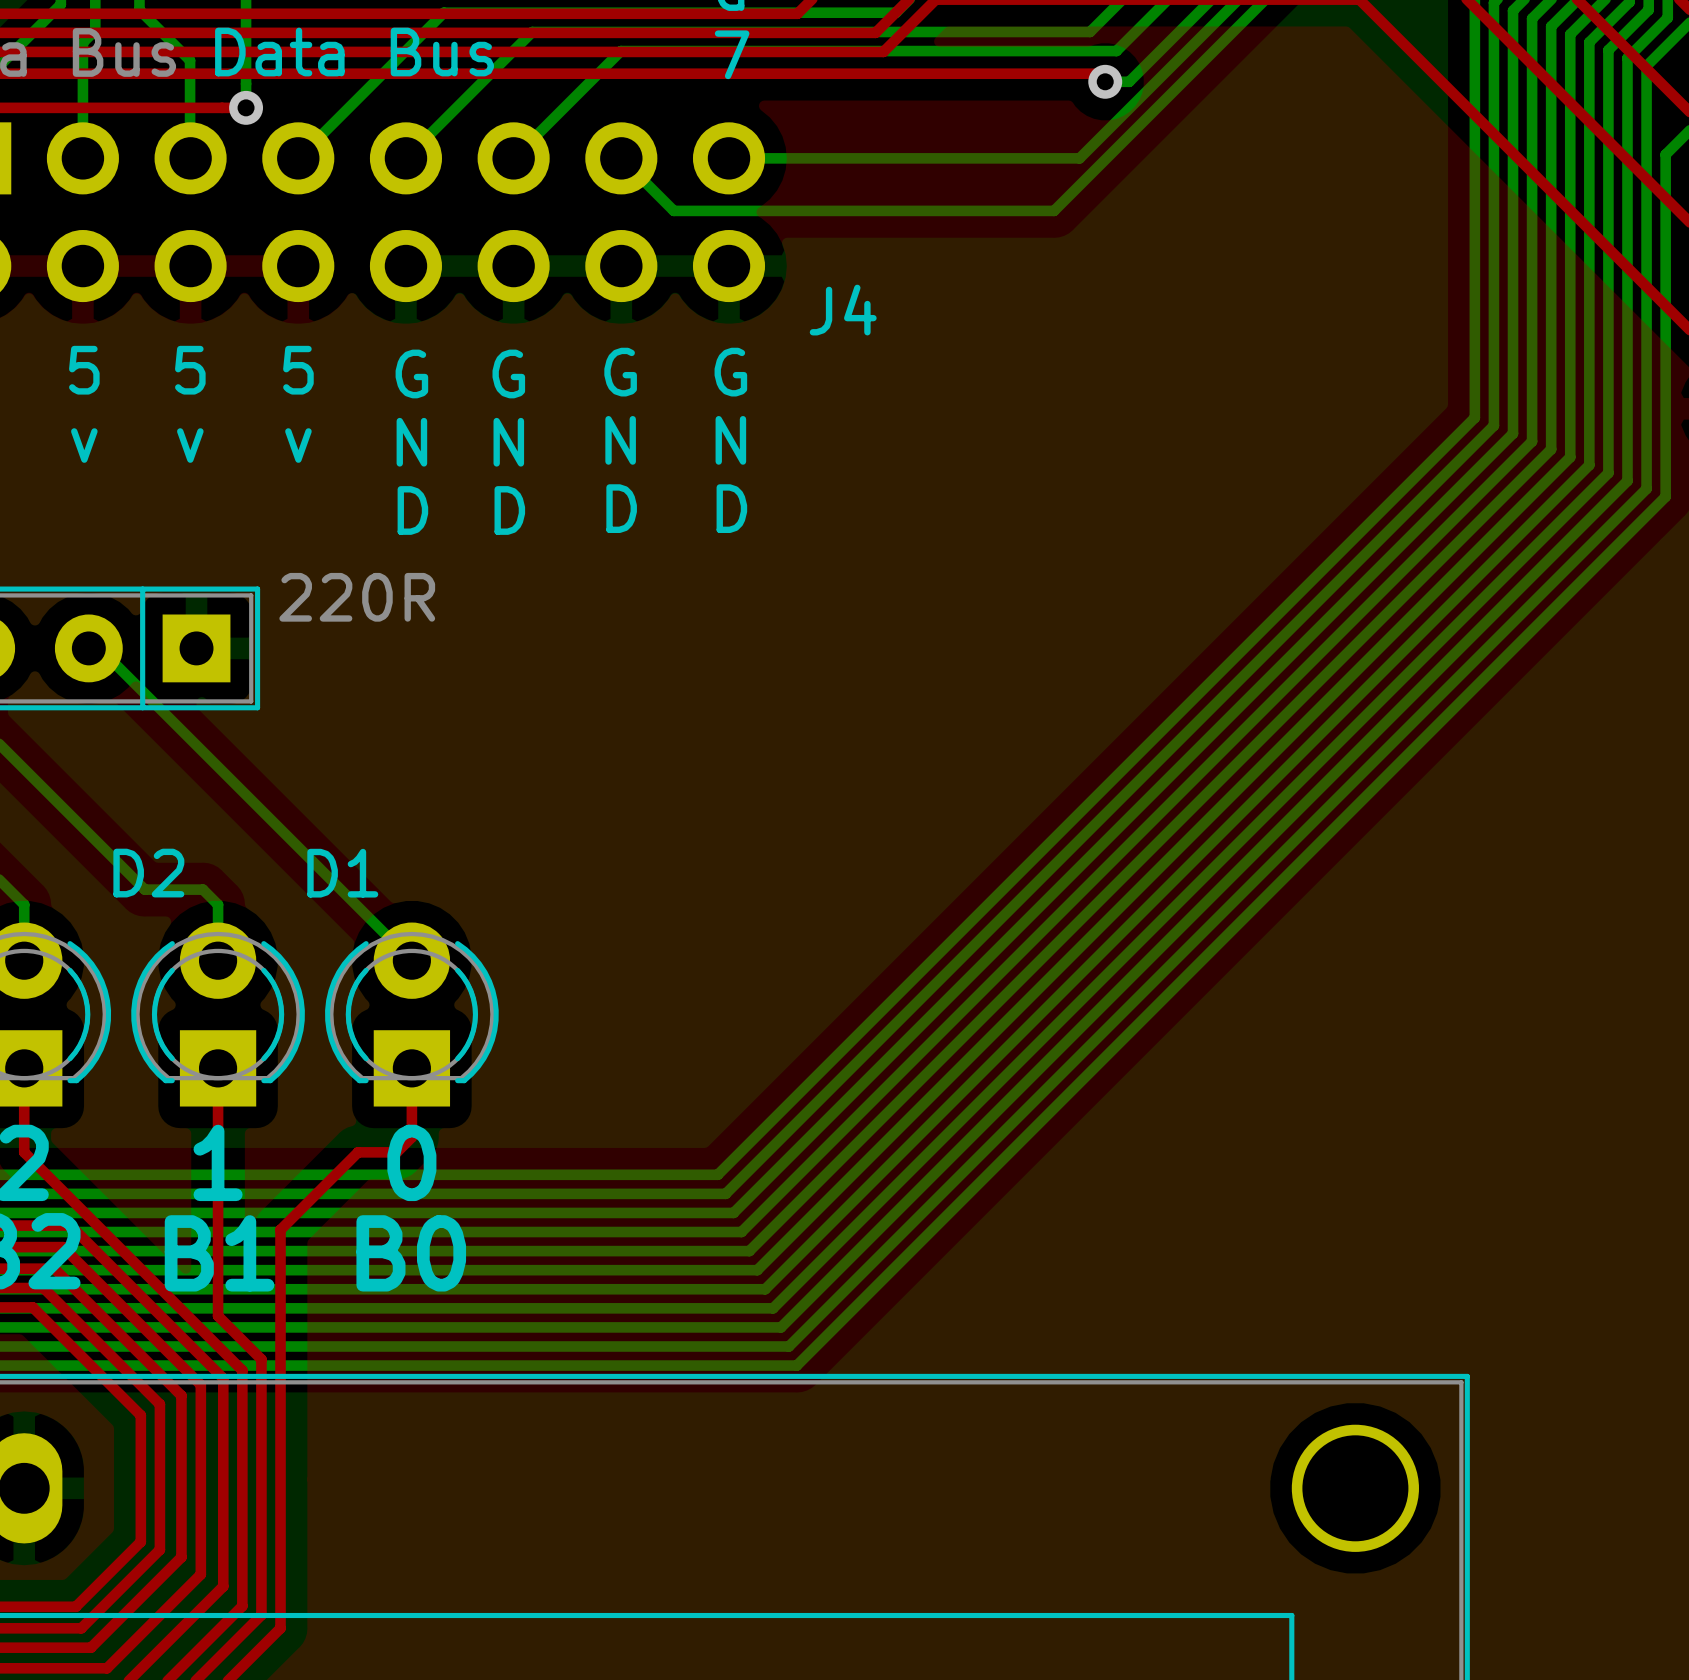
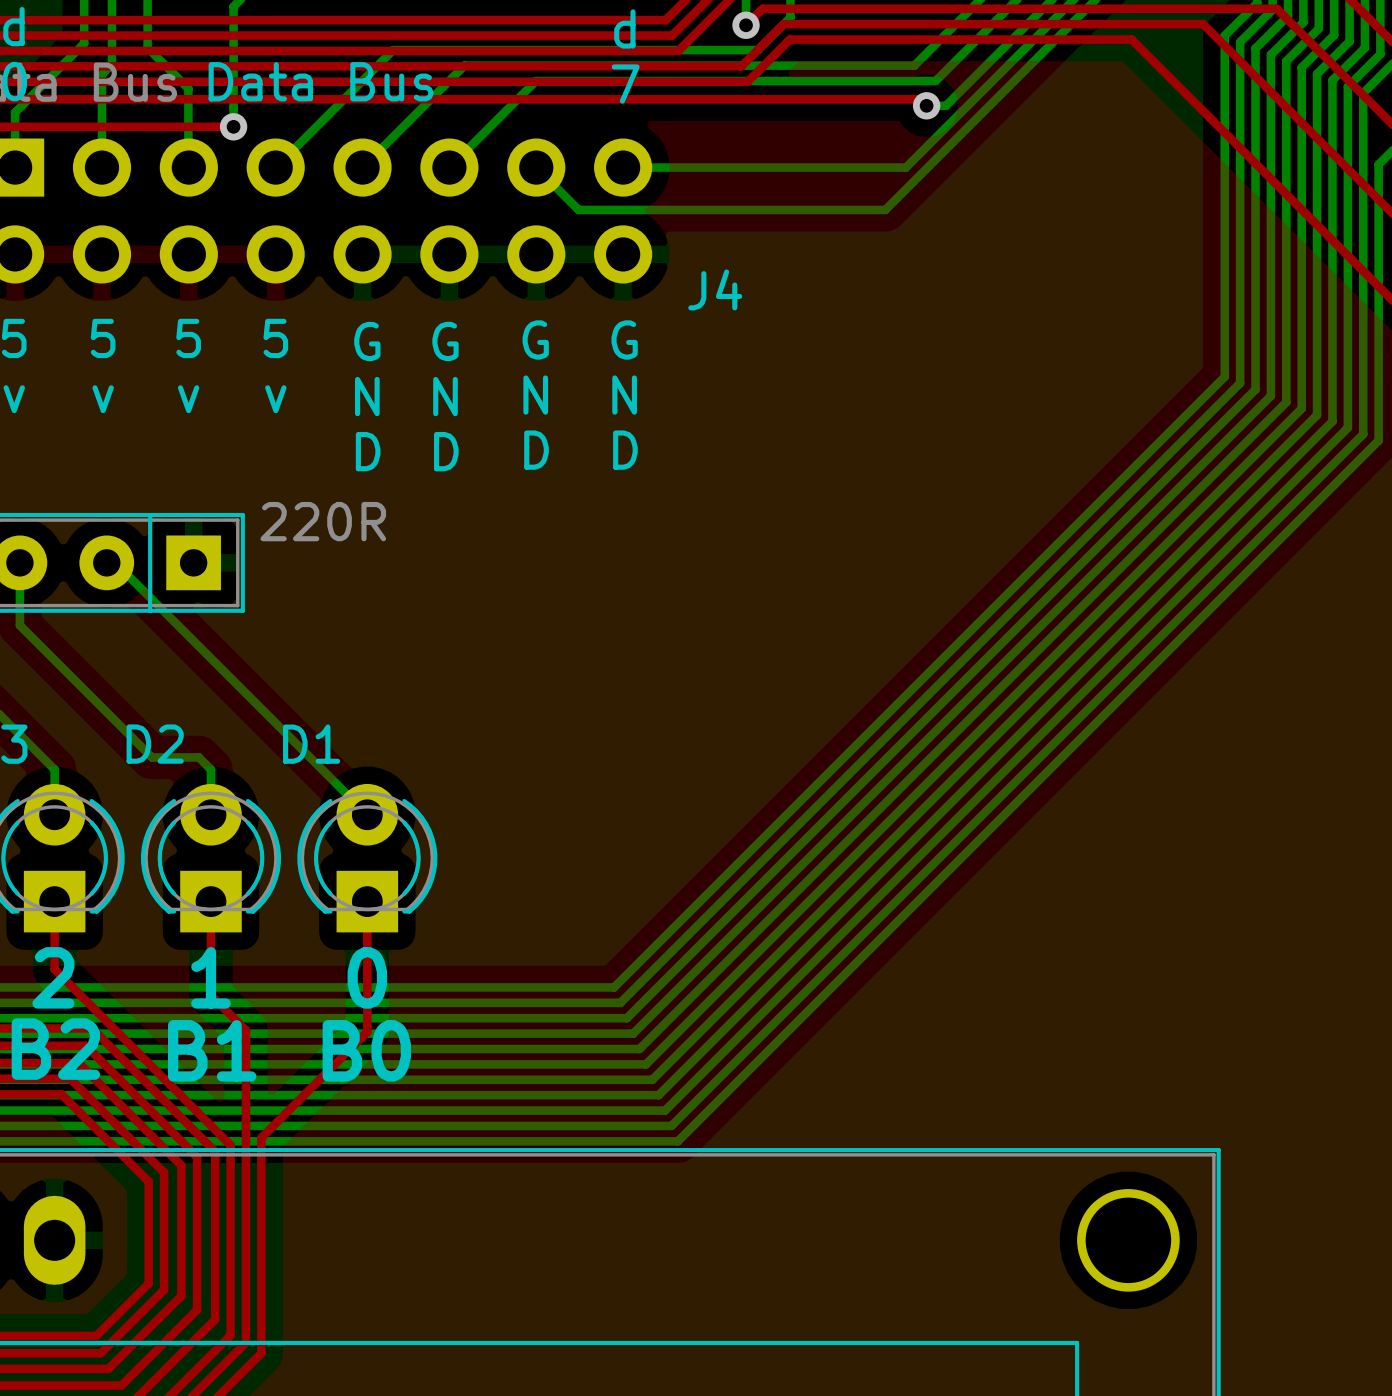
top track: (411, 1137) (396, 1152) (358, 1152) (280, 1229) (280, 1361) -> (367, 957) (367, 1031) (261, 1137)
top track: (218, 1184) (218, 1316) (261, 1359) -> (210, 995) (245, 1030) (245, 1136)

